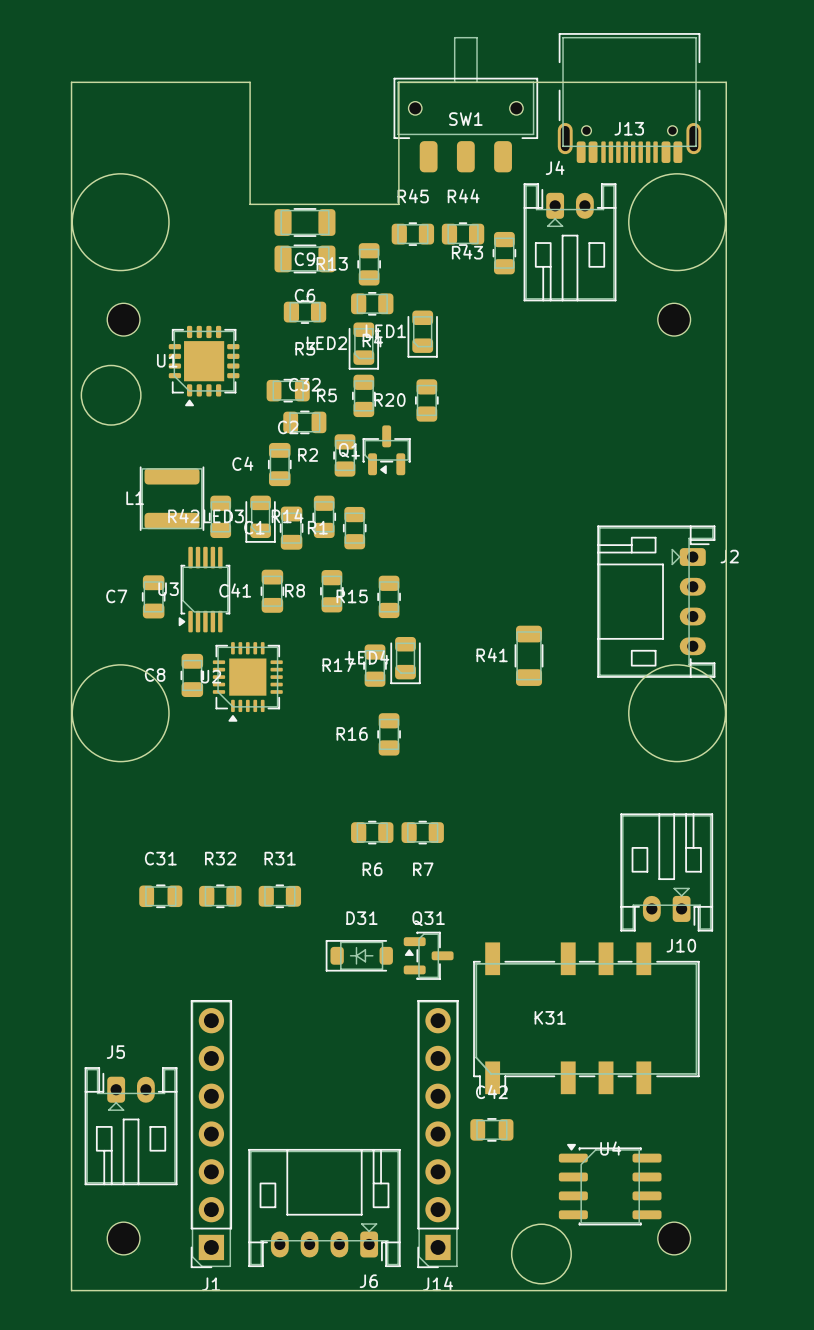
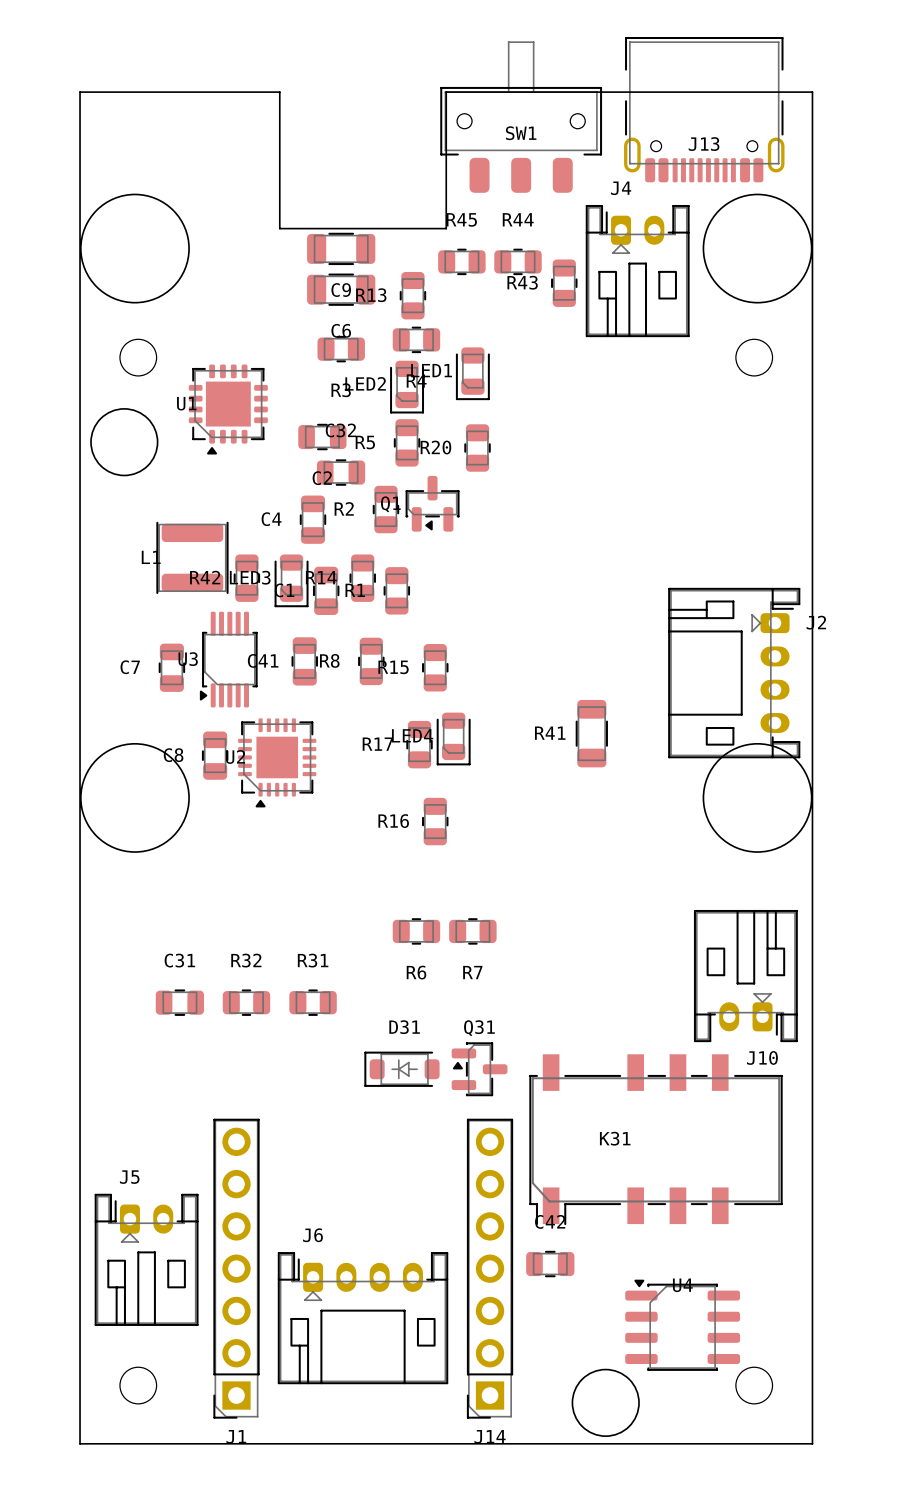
J6 rotation: 0° (324, 1208) -> 180° (363, 1318)

